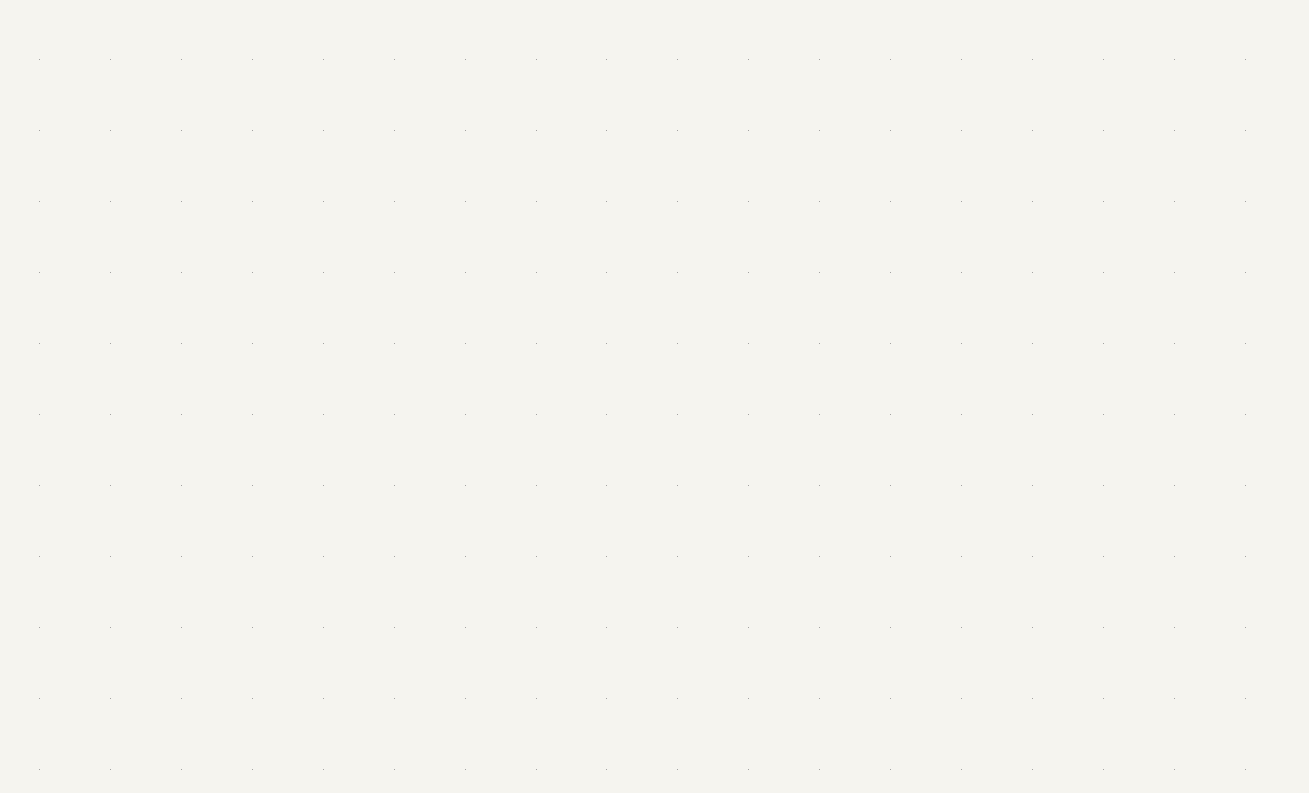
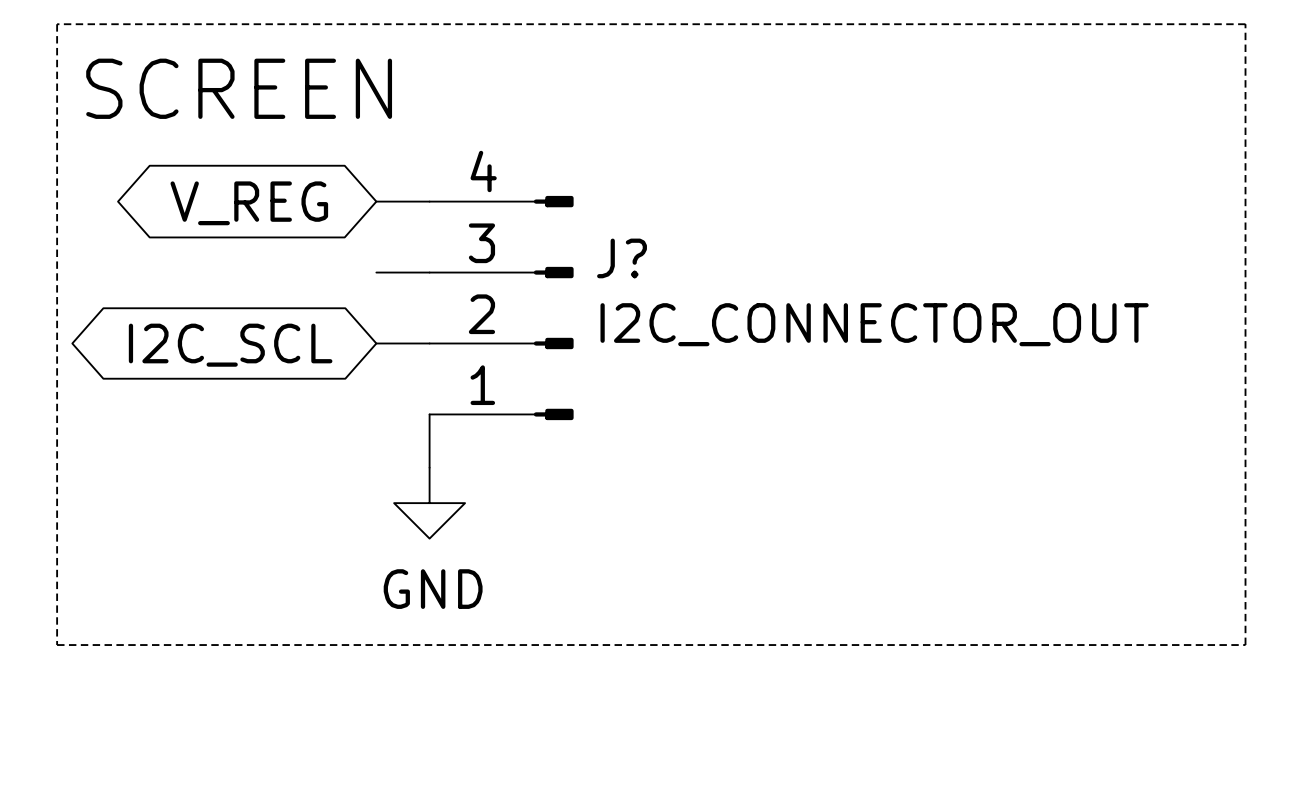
line: none -> (57, 24) (57, 645) (1245, 645) (1245, 24) (57, 24)
text: none -> SCREEN (239, 88)
wire: none -> (376, 201) (429, 201)
global label: none -> V_REG (249, 203)
wire: none -> (376, 272) (429, 272)
J?: none -> I2C_CONNECTOR_OUT (501, 308)
wire: none -> (376, 343) (429, 343)
global label: none -> I2C_SCL (230, 345)
wire: none -> (429, 414) (429, 467)
power symbol: none -> GND (429, 503)

